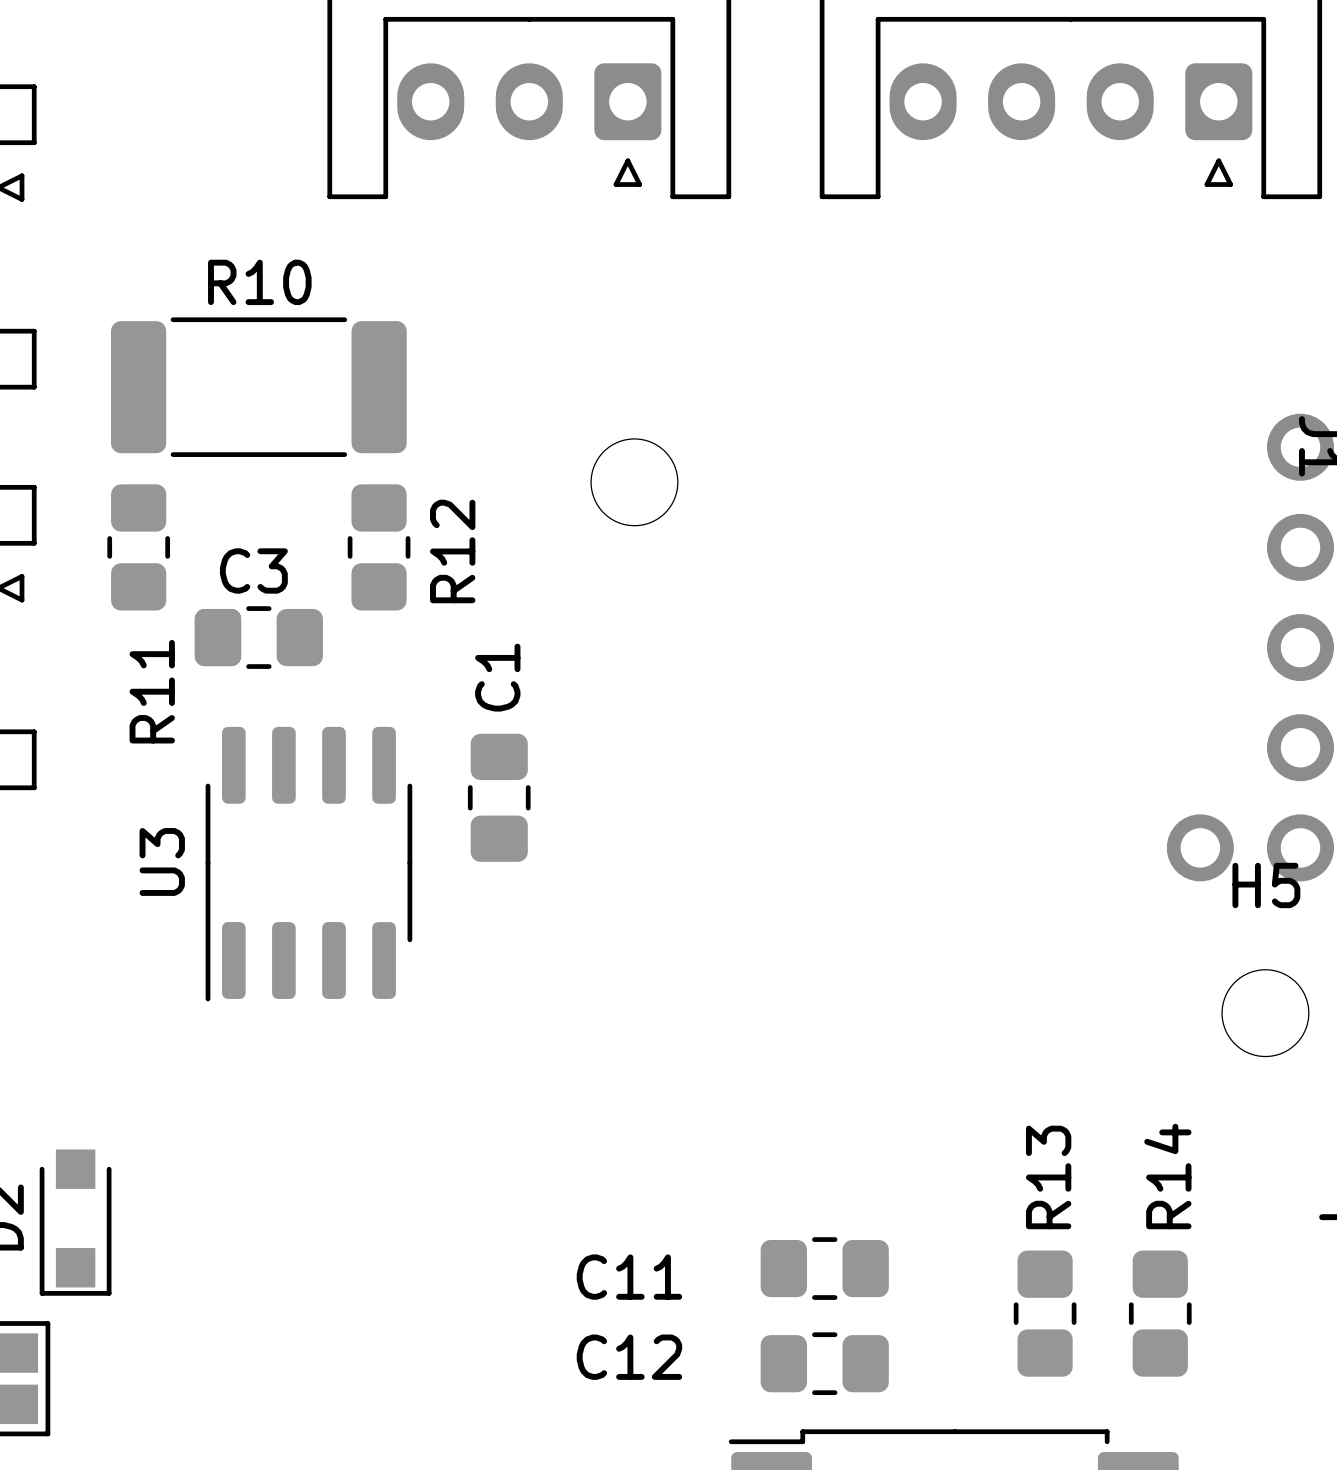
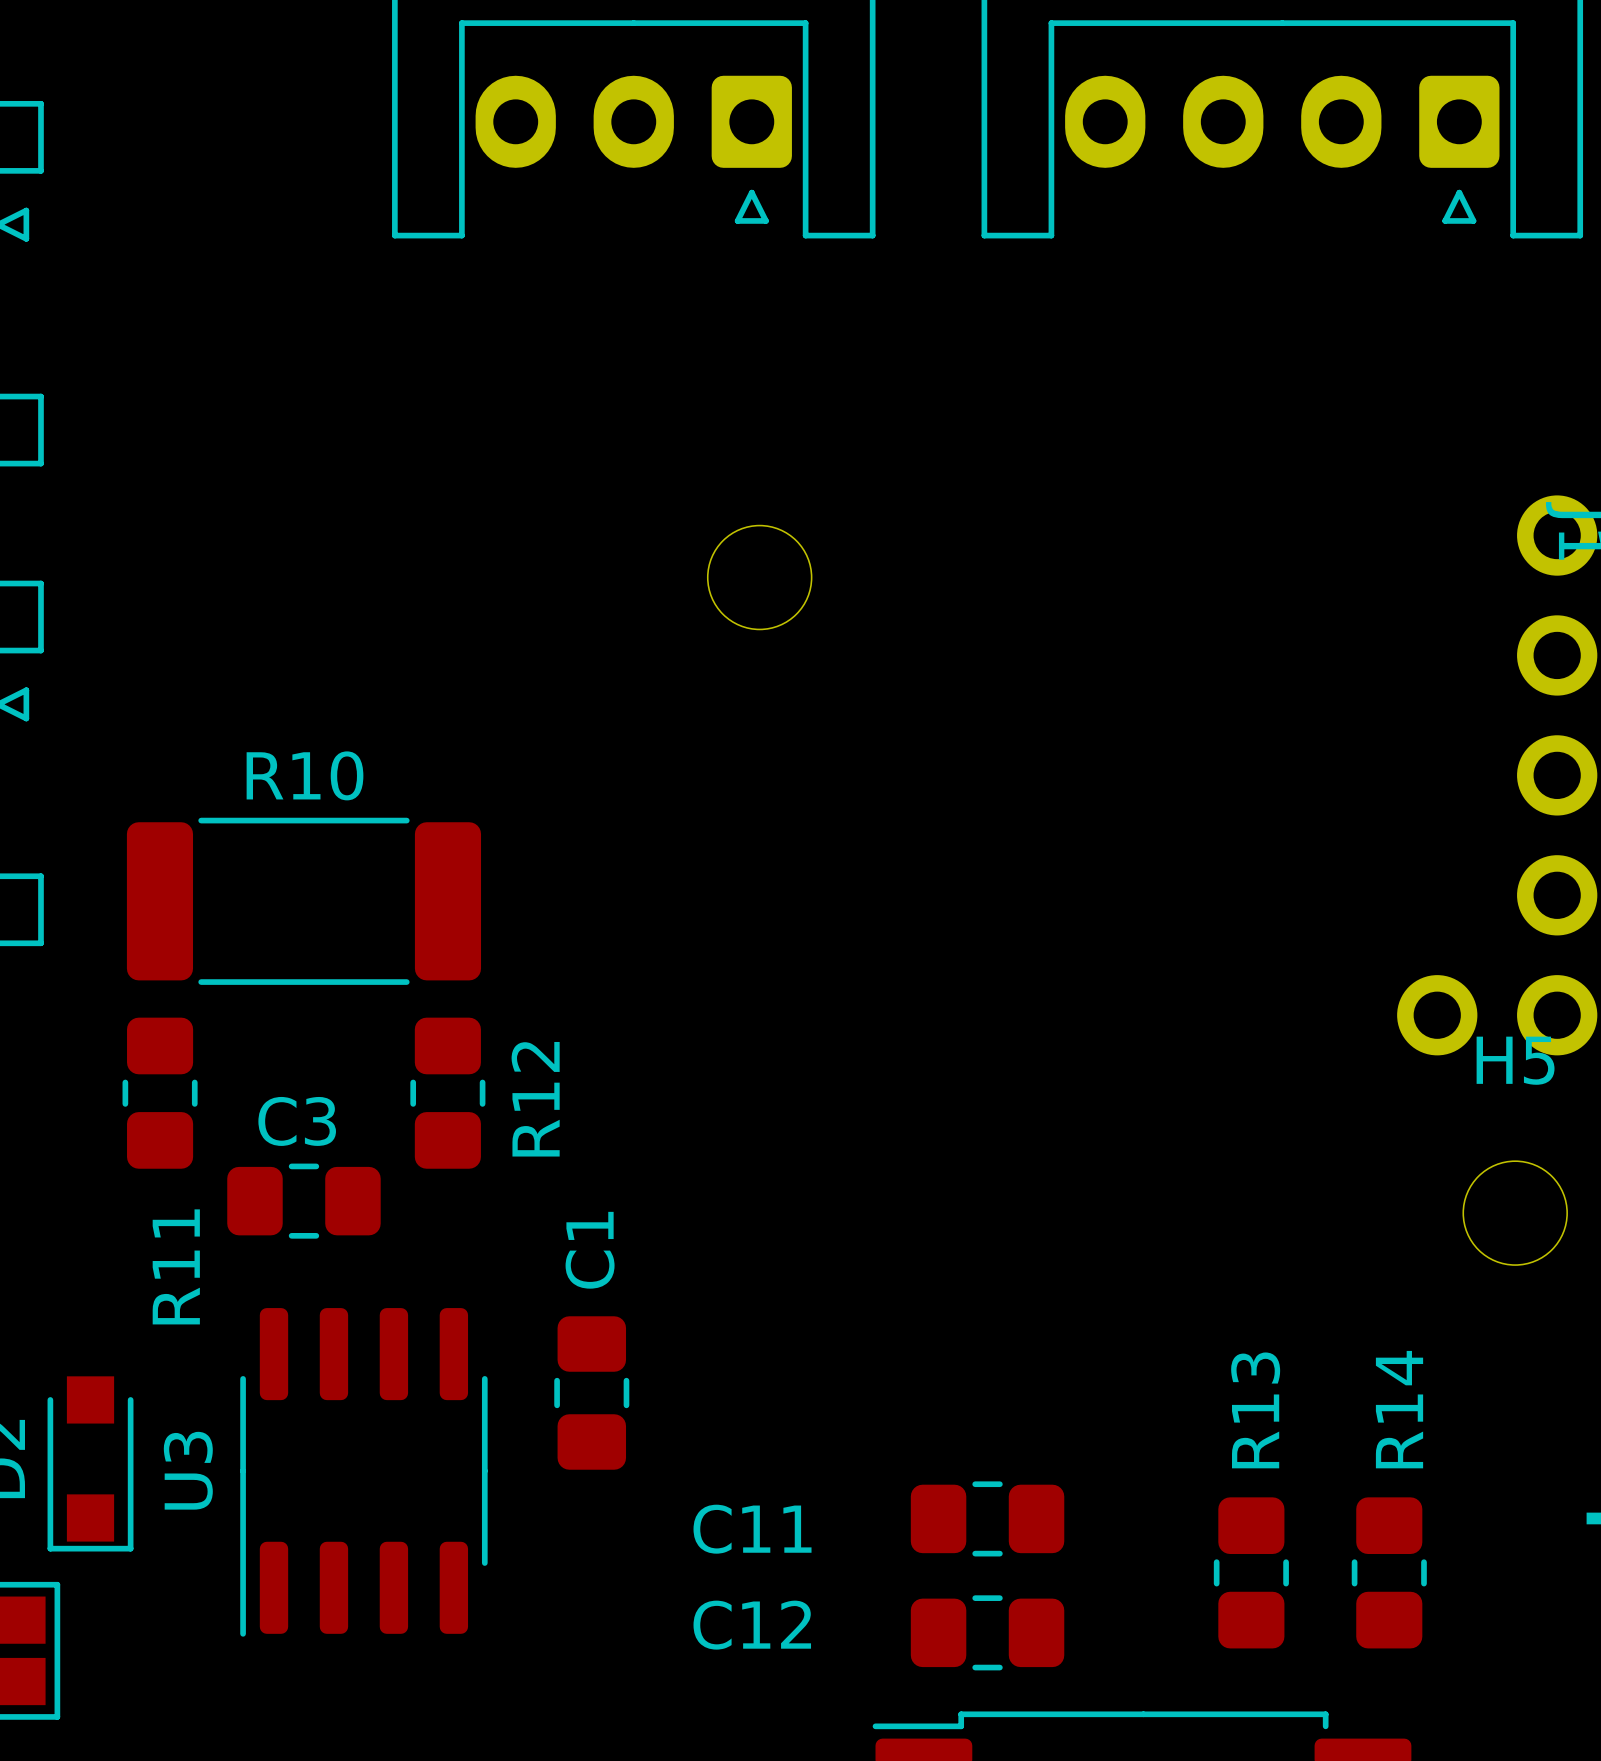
R10 position: (258, 387) -> (303, 901)
R11 position: (138, 547) -> (160, 1093)
R12 position: (379, 547) -> (447, 1093)
part: (217, 637) -> none
C3 position: (258, 637) -> (303, 1201)
C1 position: (499, 797) -> (591, 1393)
U3 position: (308, 864) -> (363, 1472)

